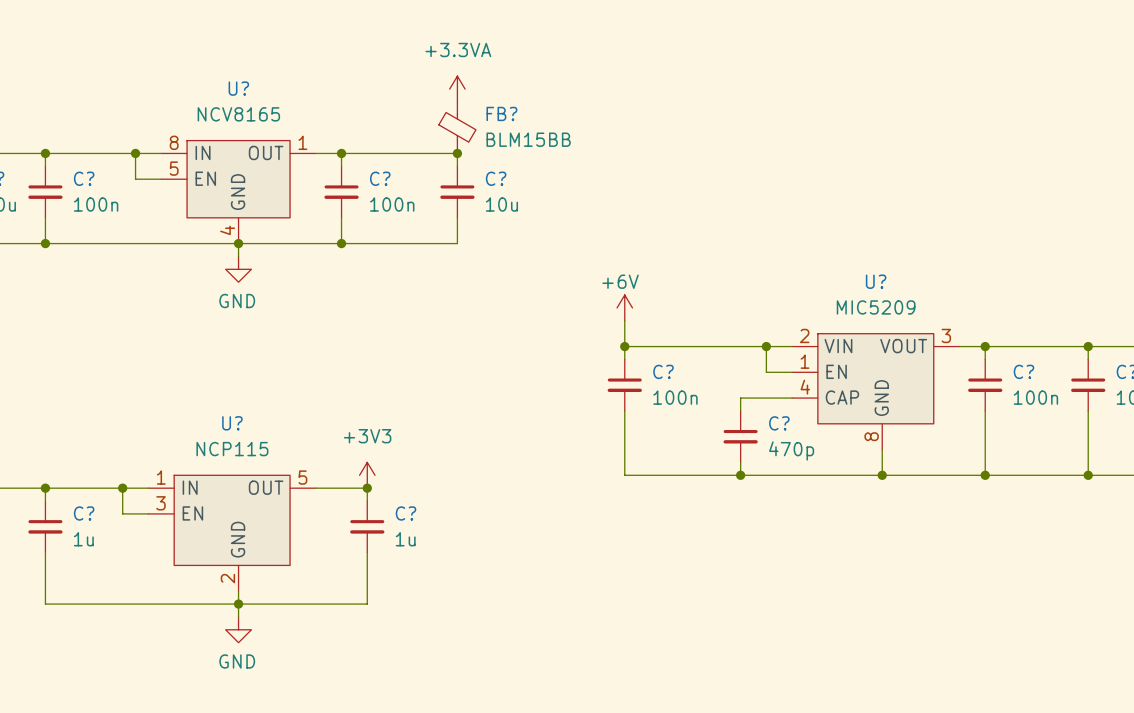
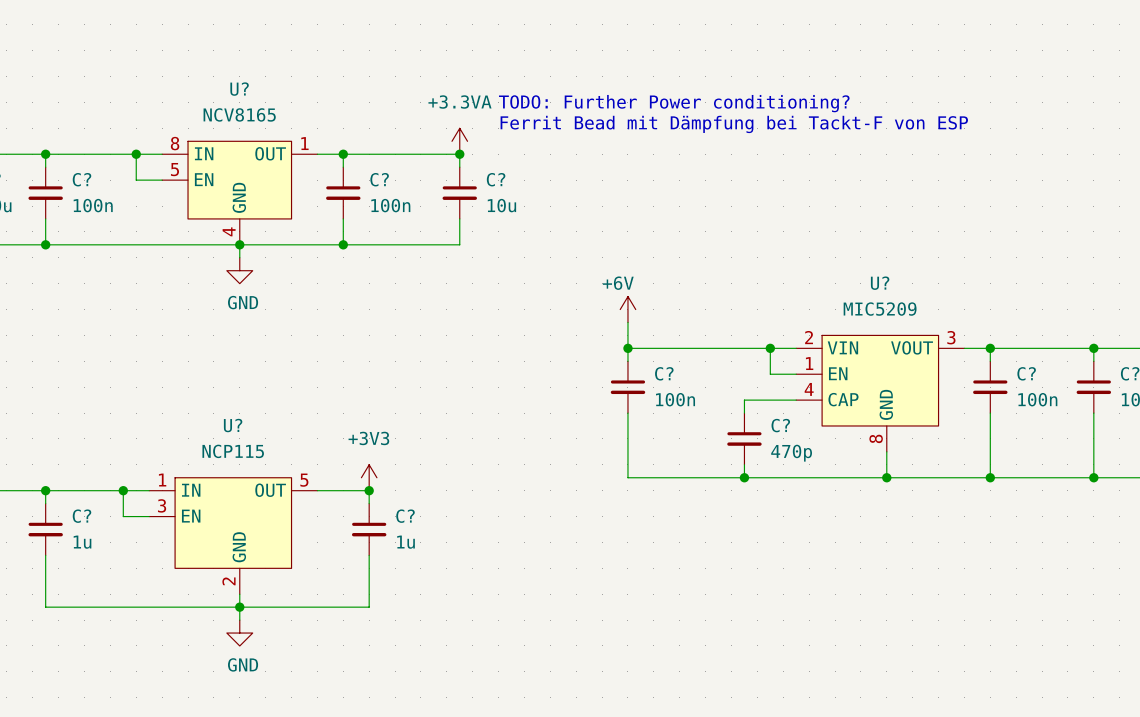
power symbol position: +3.3VA (457, 89) -> +3.3VA (459, 141)
text: none -> TODO: Further Power conditioning? (674, 103)
text: none -> Ferrit Bead mit Dämpfung bei Tackt-F von ESP (734, 124)
FB?: BLM15BB (457, 127) -> none

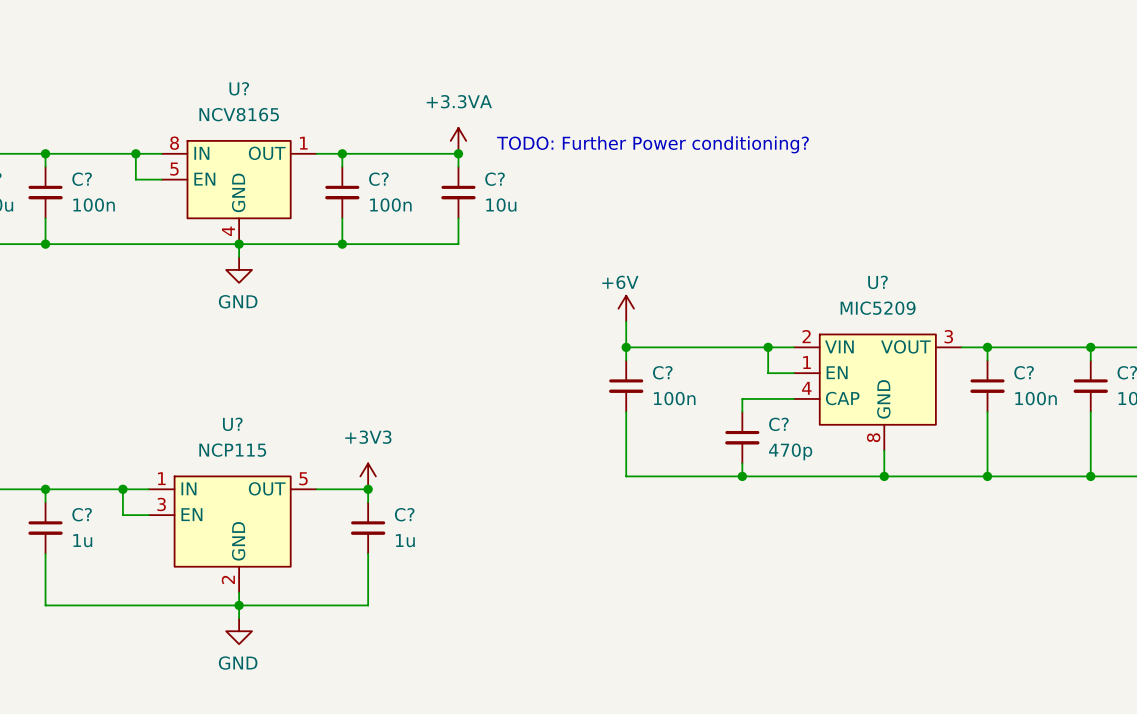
text position: TODO: Further Power conditioning? (674, 103) -> TODO: Further Power conditioning? (652, 144)
text: Ferrit Bead mit Dämpfung bei Tackt-F von ESP (734, 124) -> none

